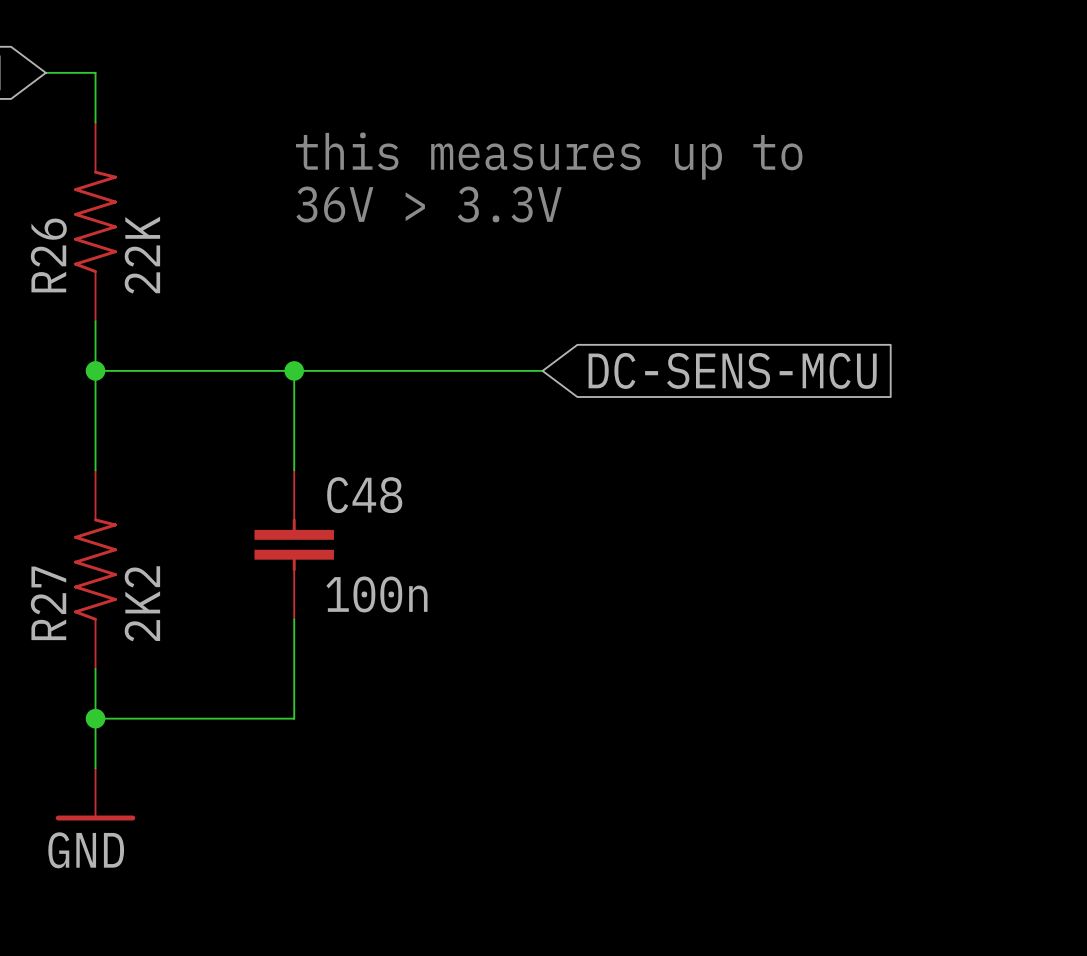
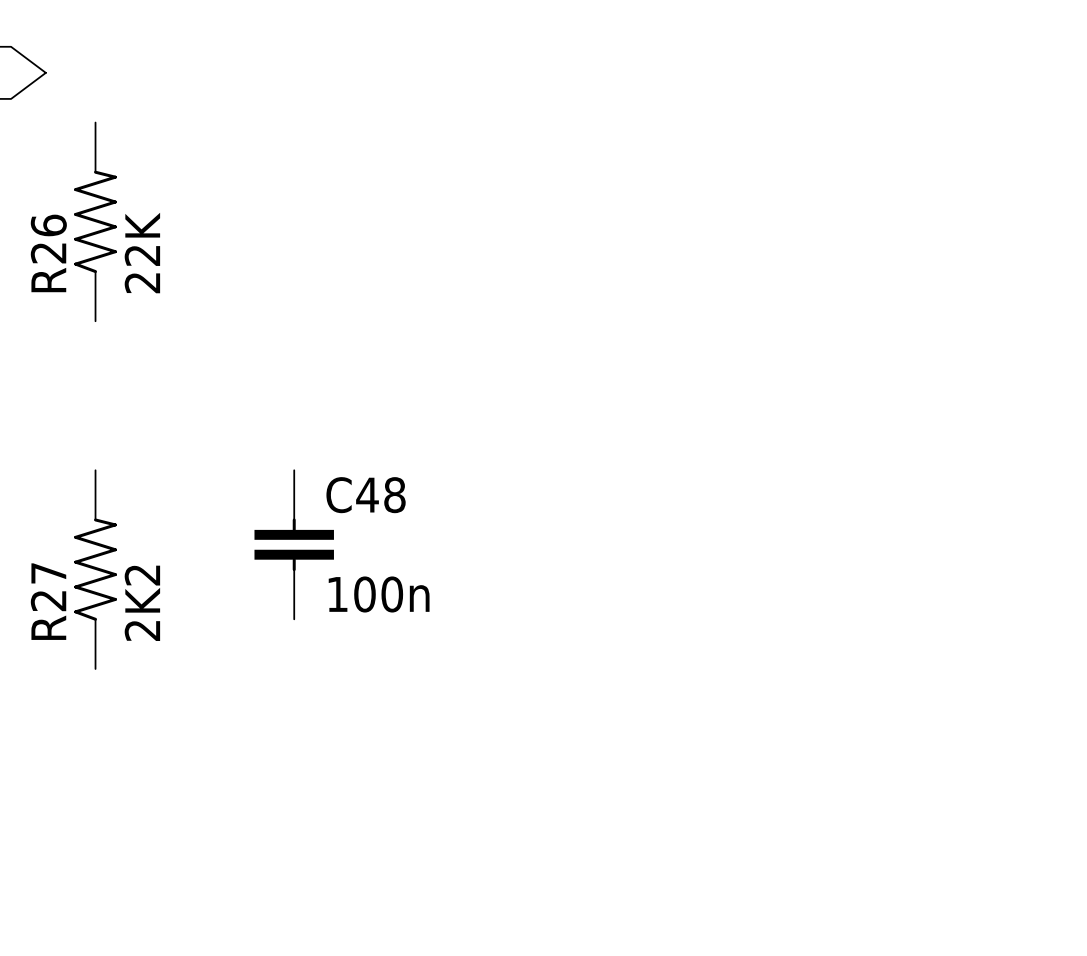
wire: (45, 72) (95, 72) (95, 122) -> none
text: this measures up to (549, 156) -> none
text: 36V > 3.3V (429, 204) -> none
wire: (95, 321) (95, 470) -> none
wire: (95, 370) (542, 370) -> none
junction: (95, 370) -> none
wire: (294, 370) (294, 470) -> none
junction: (294, 370) -> none
global label: DC-SENS-MCU (732, 370) -> none
wire: (294, 619) (294, 718) (95, 718) -> none
wire: (95, 668) (95, 768) -> none
junction: (95, 718) -> none
power symbol: GND (95, 794) -> none

